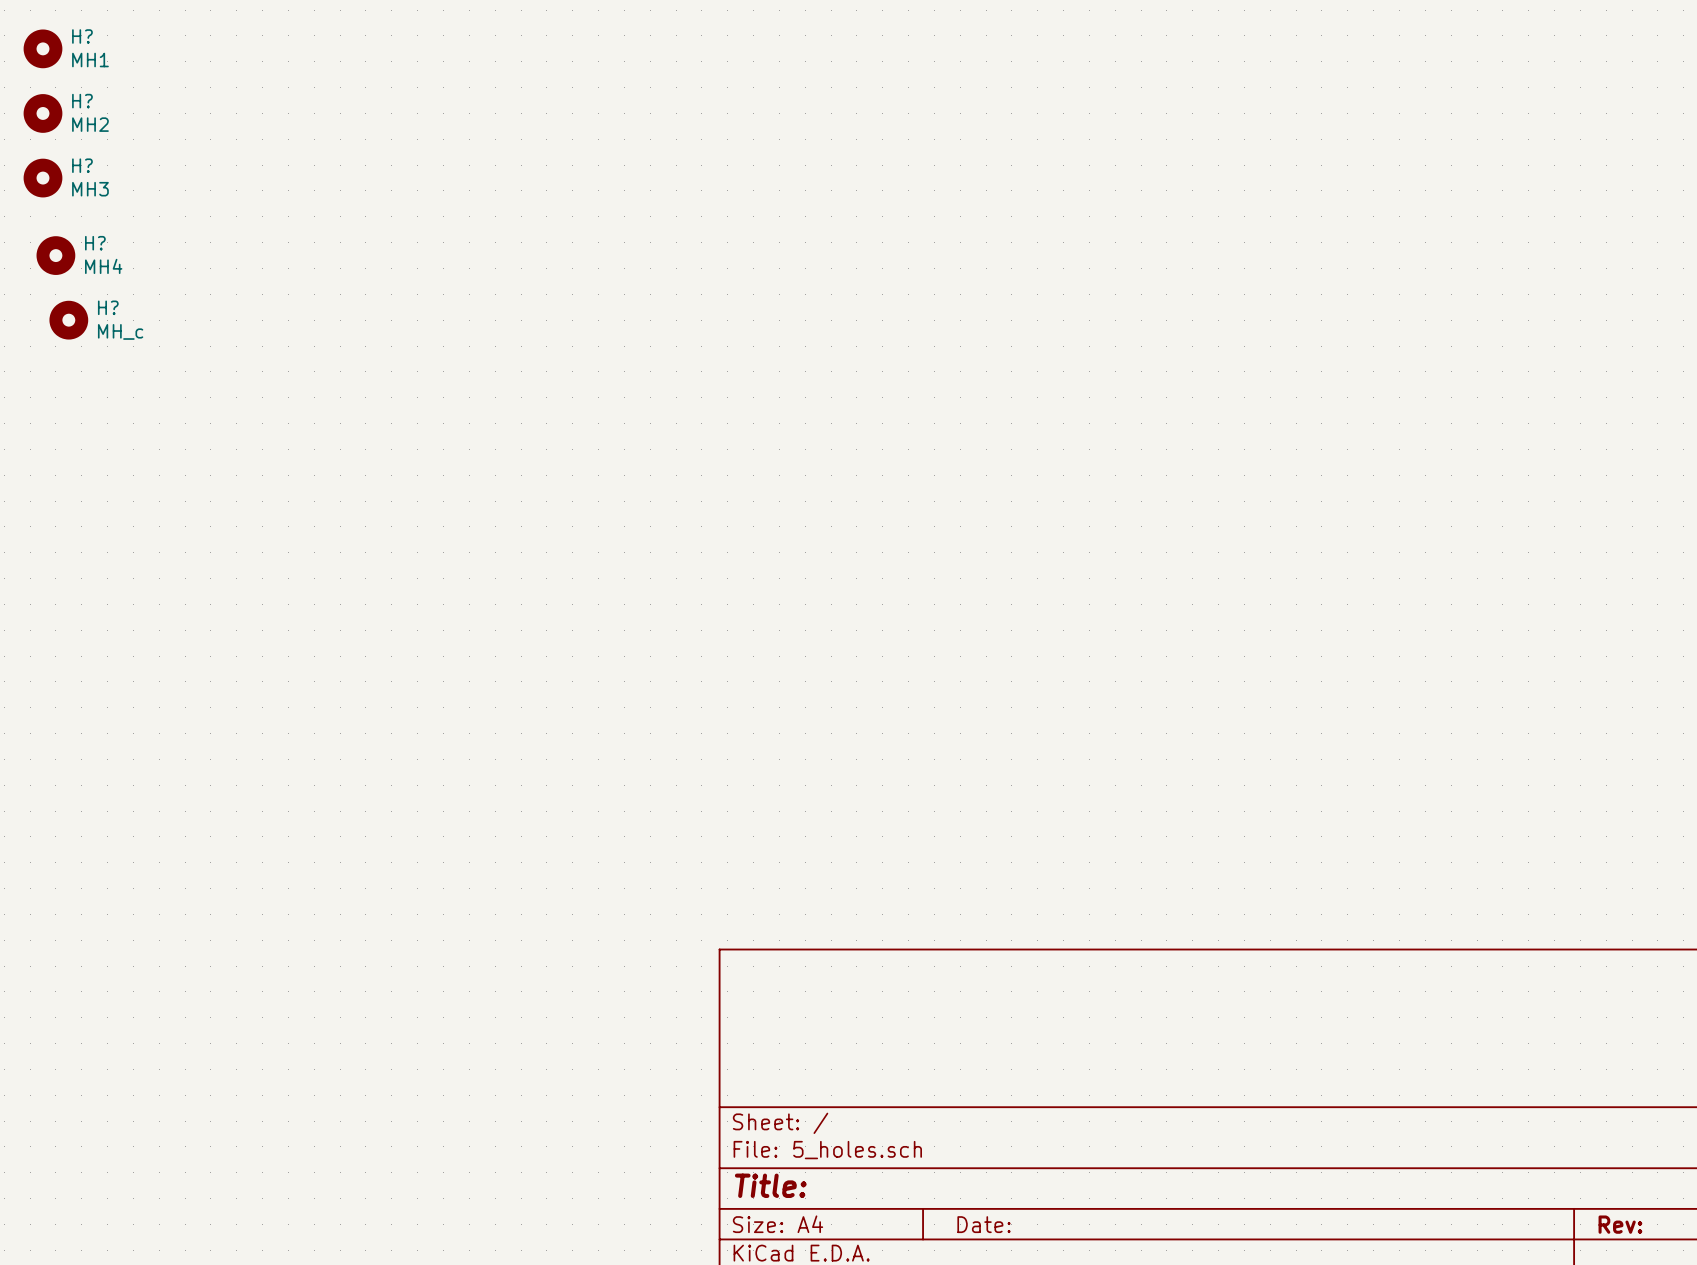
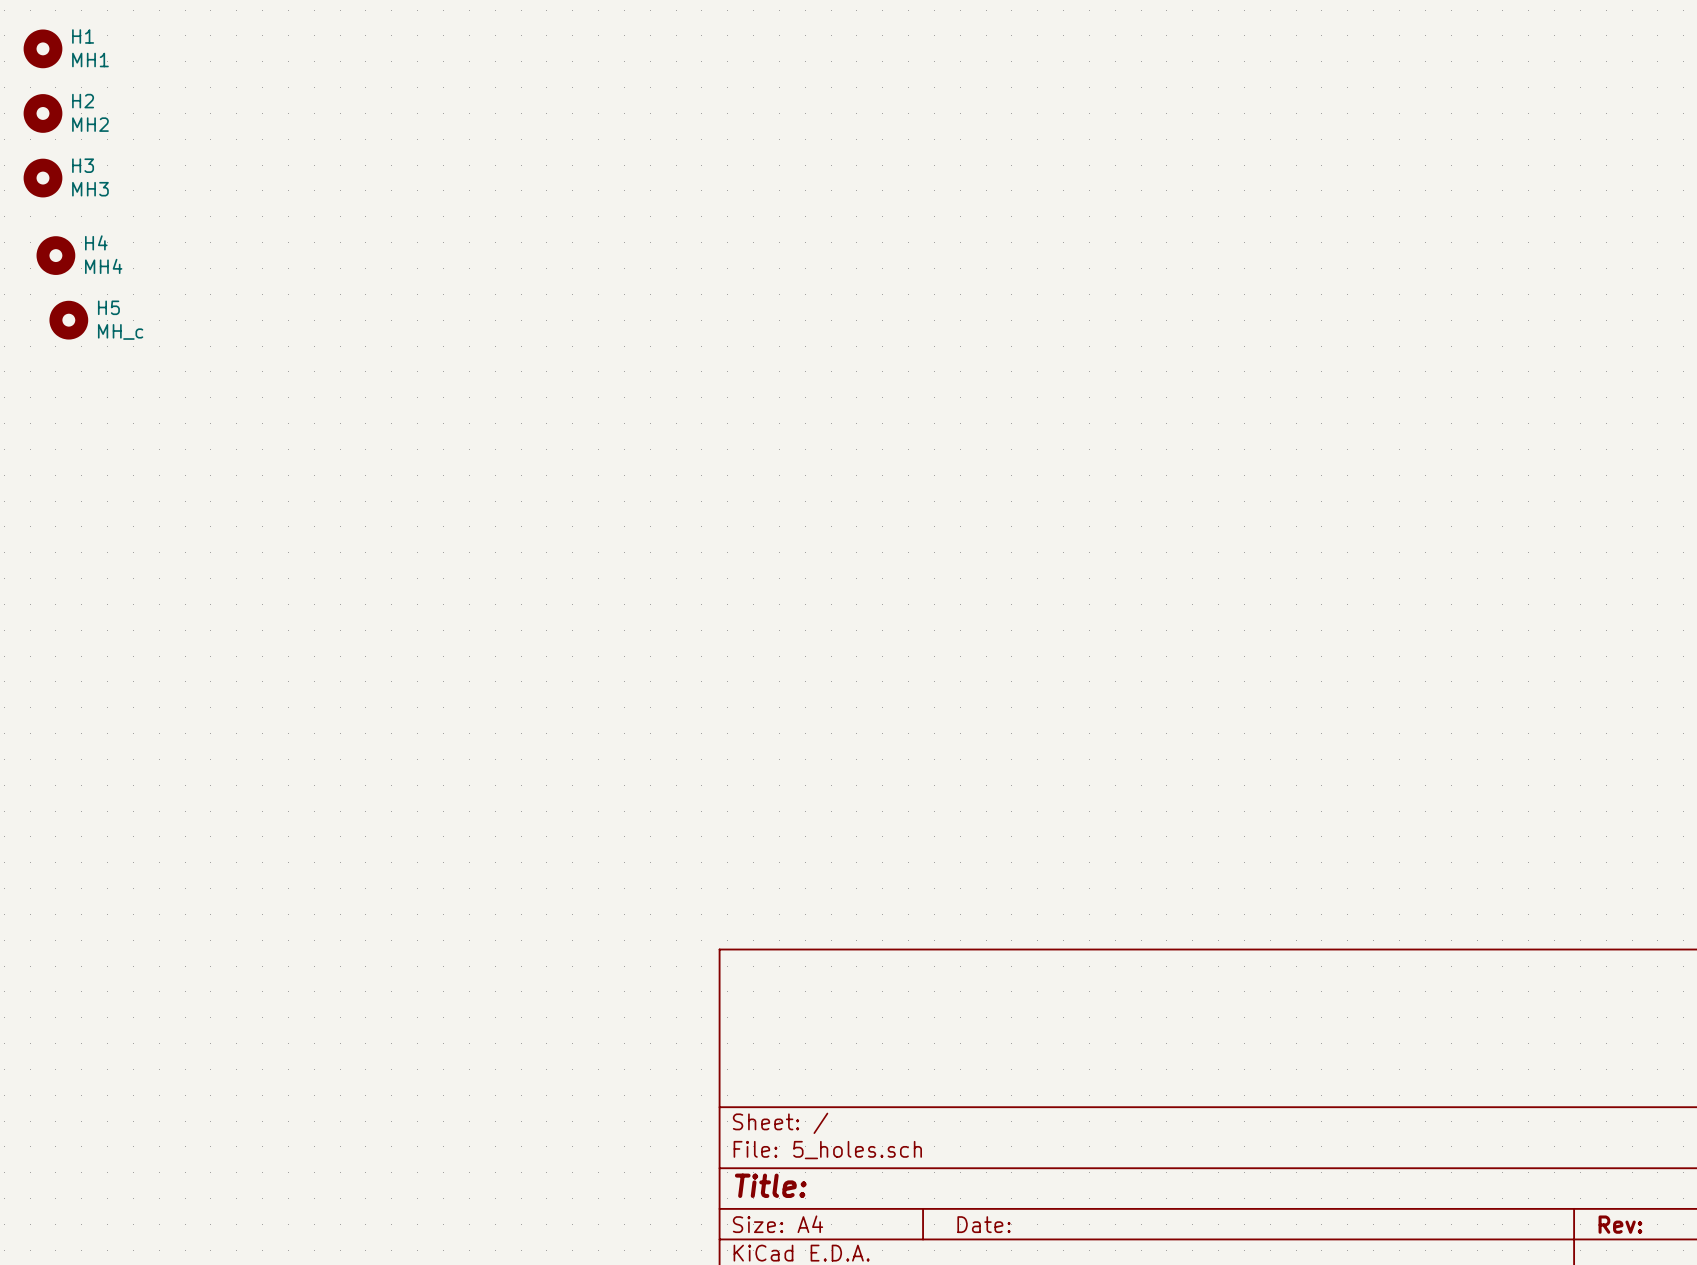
H? name: H? (82, 36) -> H1 (83, 36)
H? name: H? (82, 101) -> H2 (83, 101)
H? name: H? (82, 165) -> H3 (83, 165)
H? name: H? (95, 243) -> H4 (96, 242)
H? name: H? (108, 307) -> H5 (108, 307)

